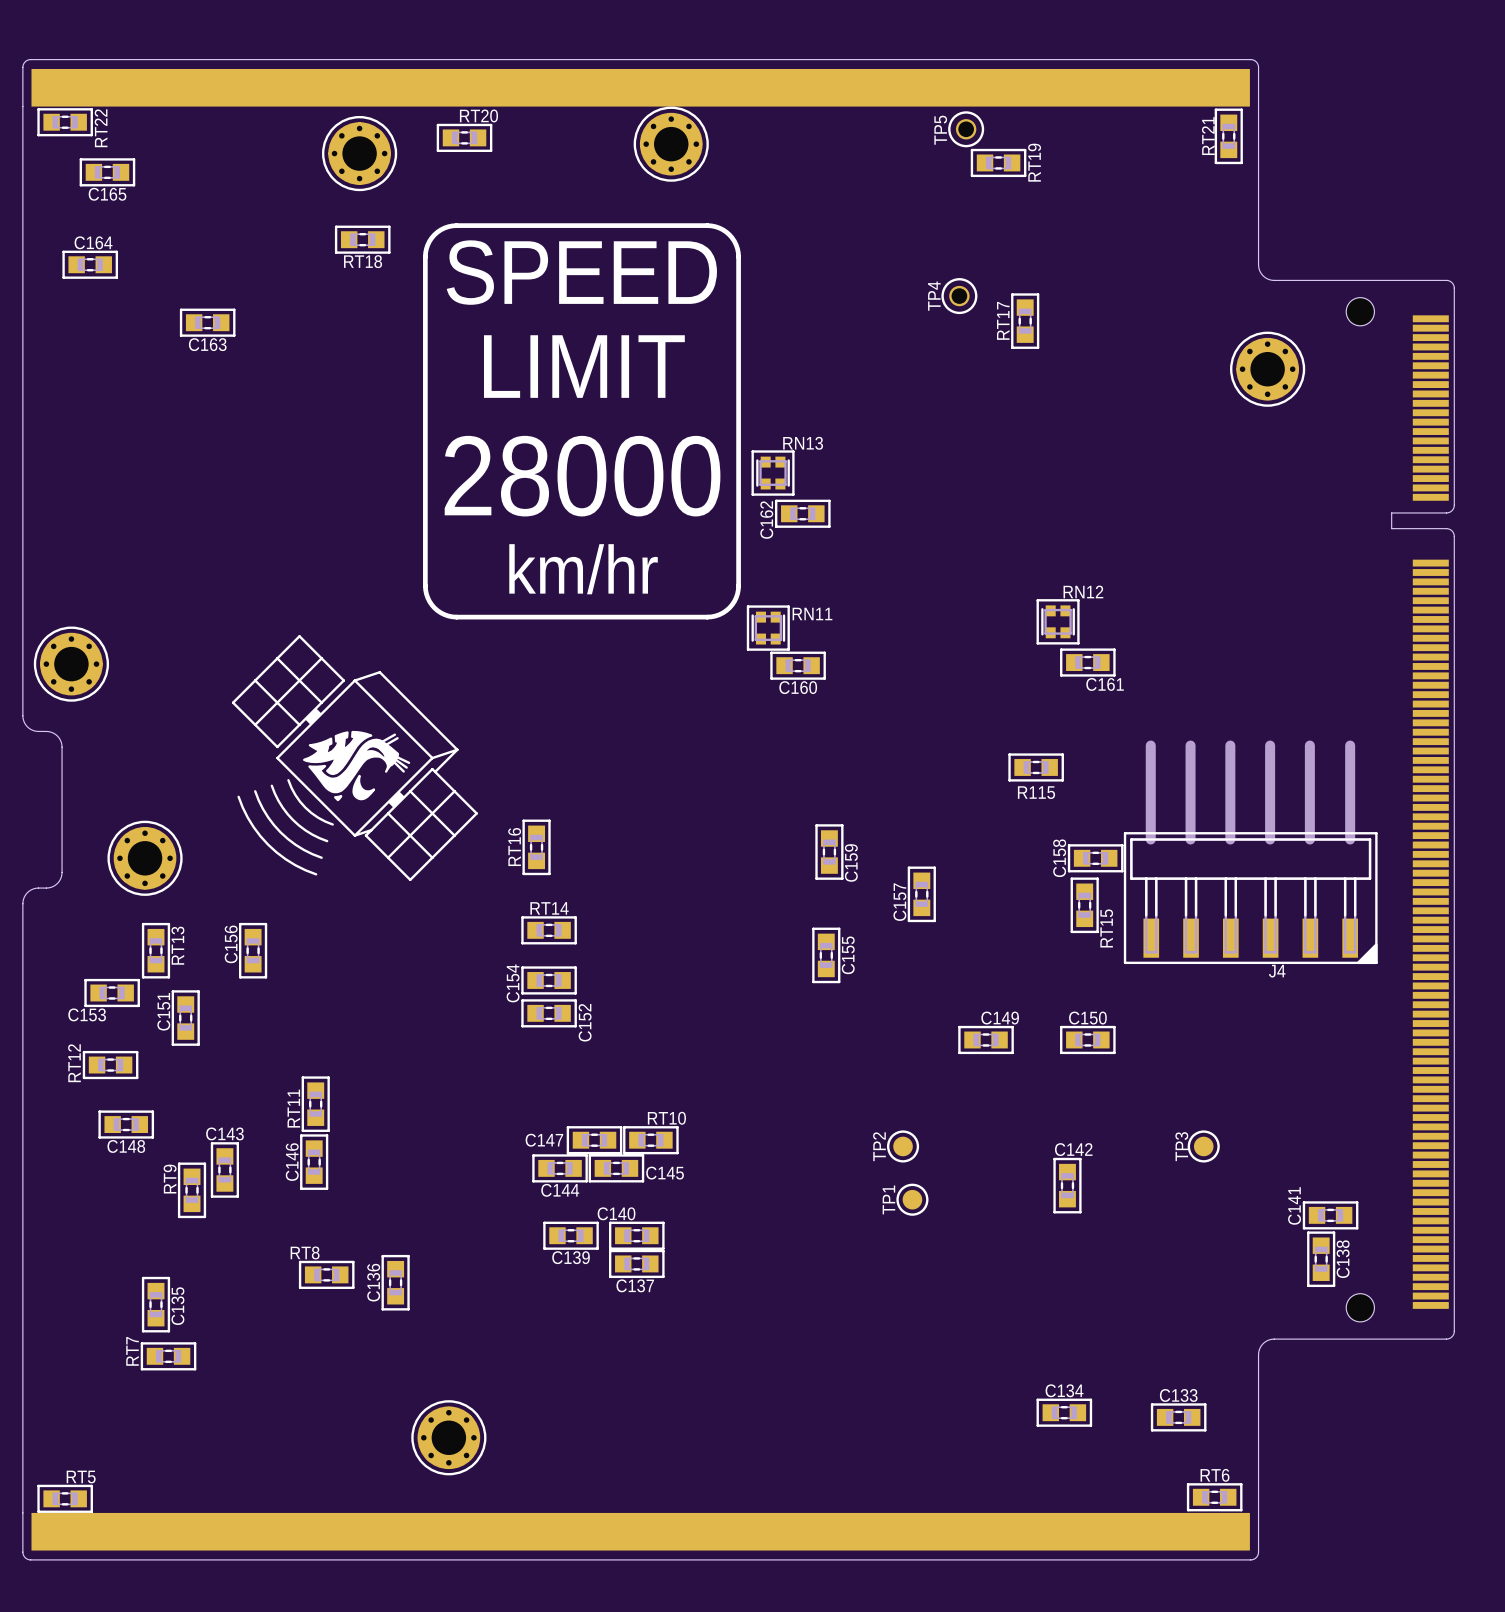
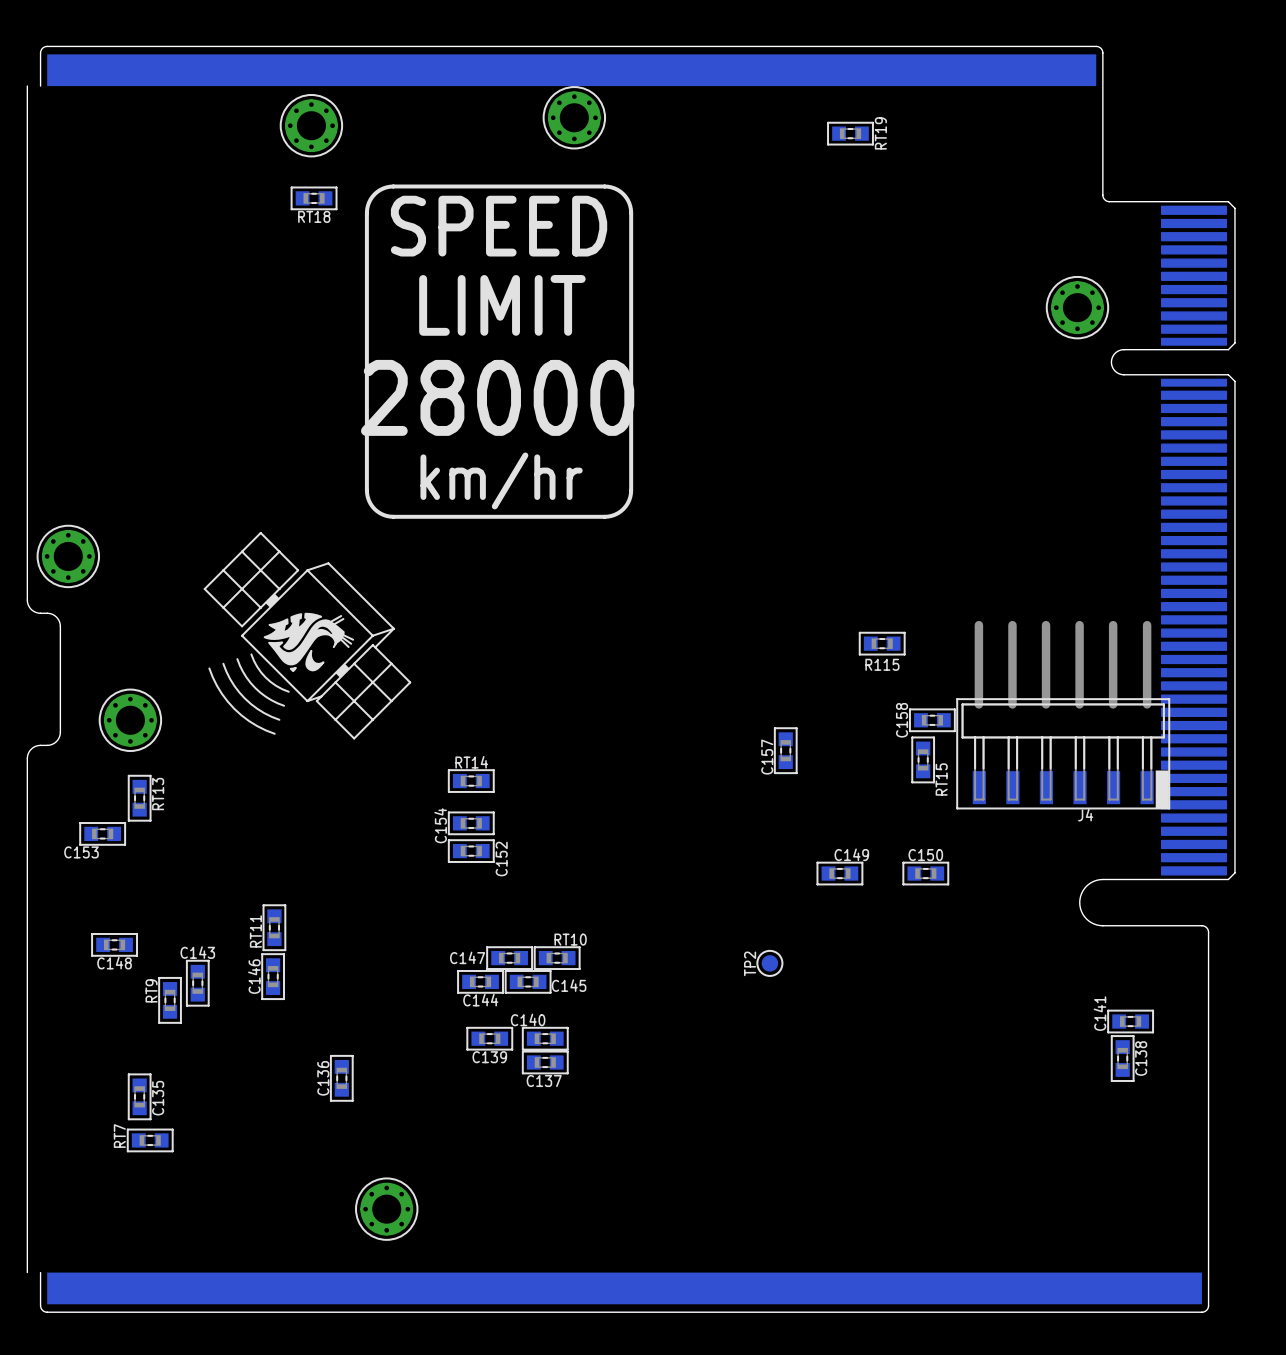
part footprint: [22, 59, 1455, 1560] -> [40, 46, 1235, 1313]
RT22: (65, 122) -> none
TP5: (966, 129) -> none
RT21: (1228, 136) -> none
RT20: (464, 137) -> none
C165: (107, 172) -> none
C164: (90, 264) -> none
TP4: (959, 296) -> none
RT17: (1025, 321) -> none
C163: (207, 322) -> none
RN13: (773, 473) -> none
C162: (802, 513) -> none
RN12: (1058, 621) -> none
RN11: (768, 628) -> none
C161: (1087, 662) -> none
C160: (798, 665) -> none
J4 footprint: [1123, 740, 1378, 965] -> [956, 620, 1171, 810]
RT16: (536, 847) -> none
C159: (829, 852) -> none
C156: (253, 950) -> none
C155: (826, 955) -> none
C151: (185, 1018) -> none
RT12: (110, 1065) -> none
TP3: (1203, 1146) -> none
C142: (1067, 1185) -> none
TP1: (912, 1199) -> none
RT8: (326, 1274) -> none
C134: (1064, 1412) -> none
C133: (1178, 1417) -> none
RT6: (1214, 1497) -> none
RT5: (65, 1498) -> none

